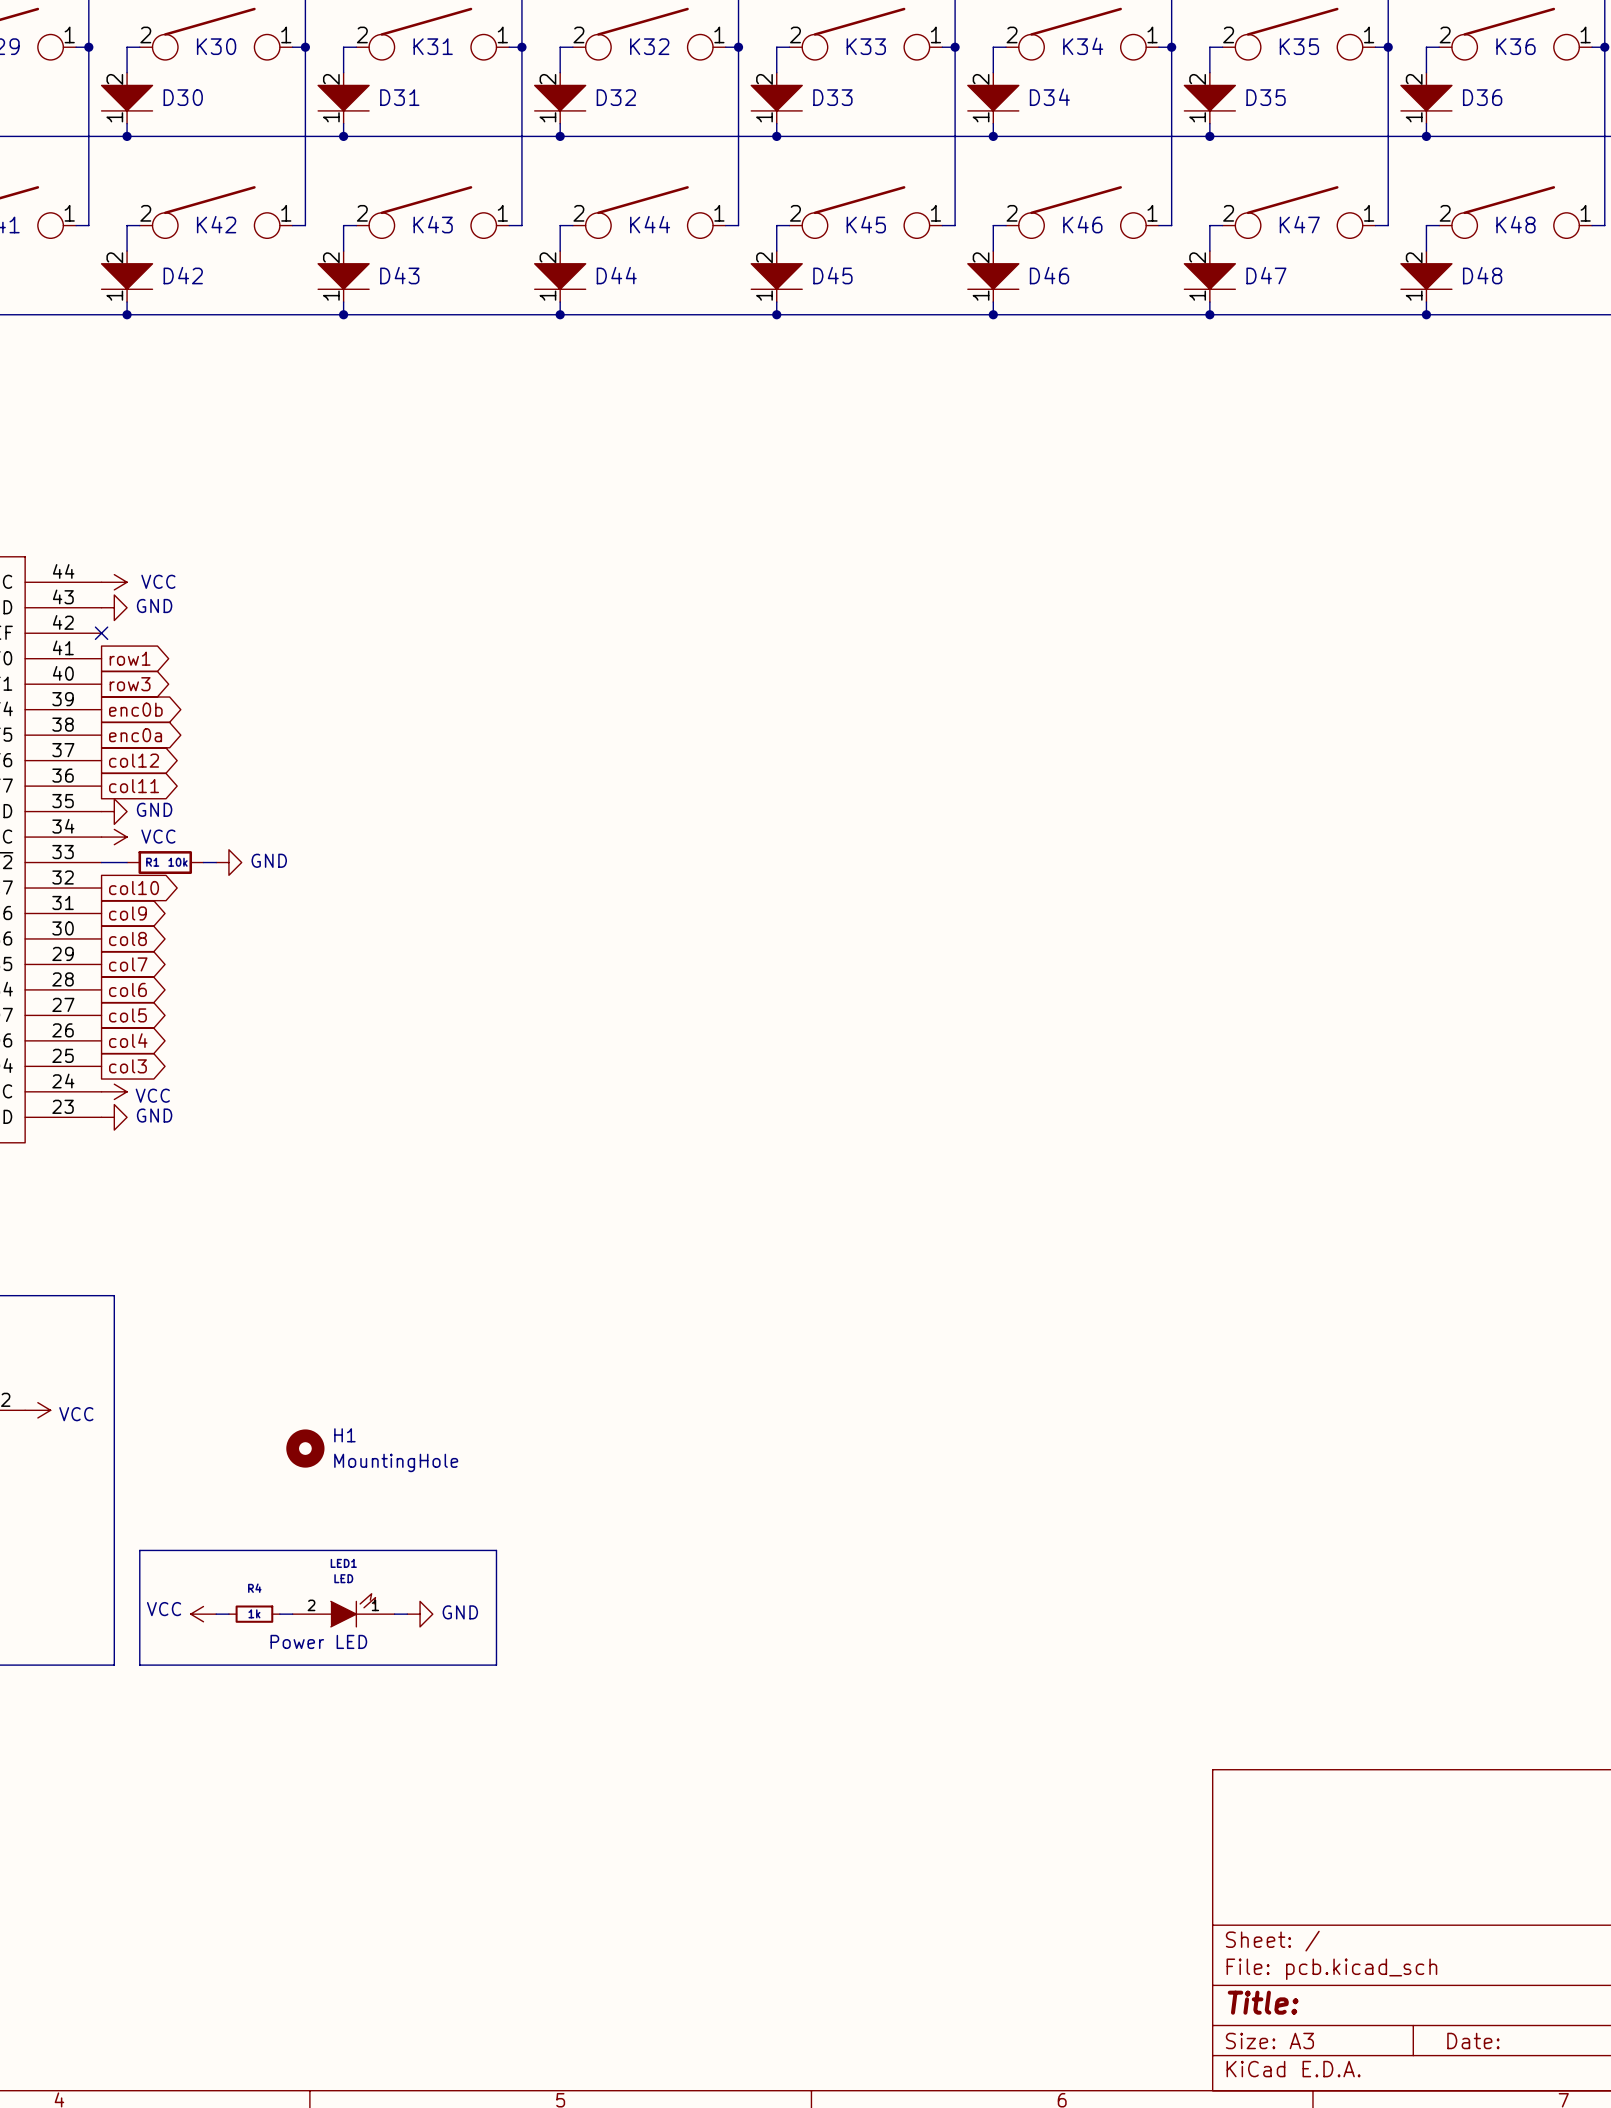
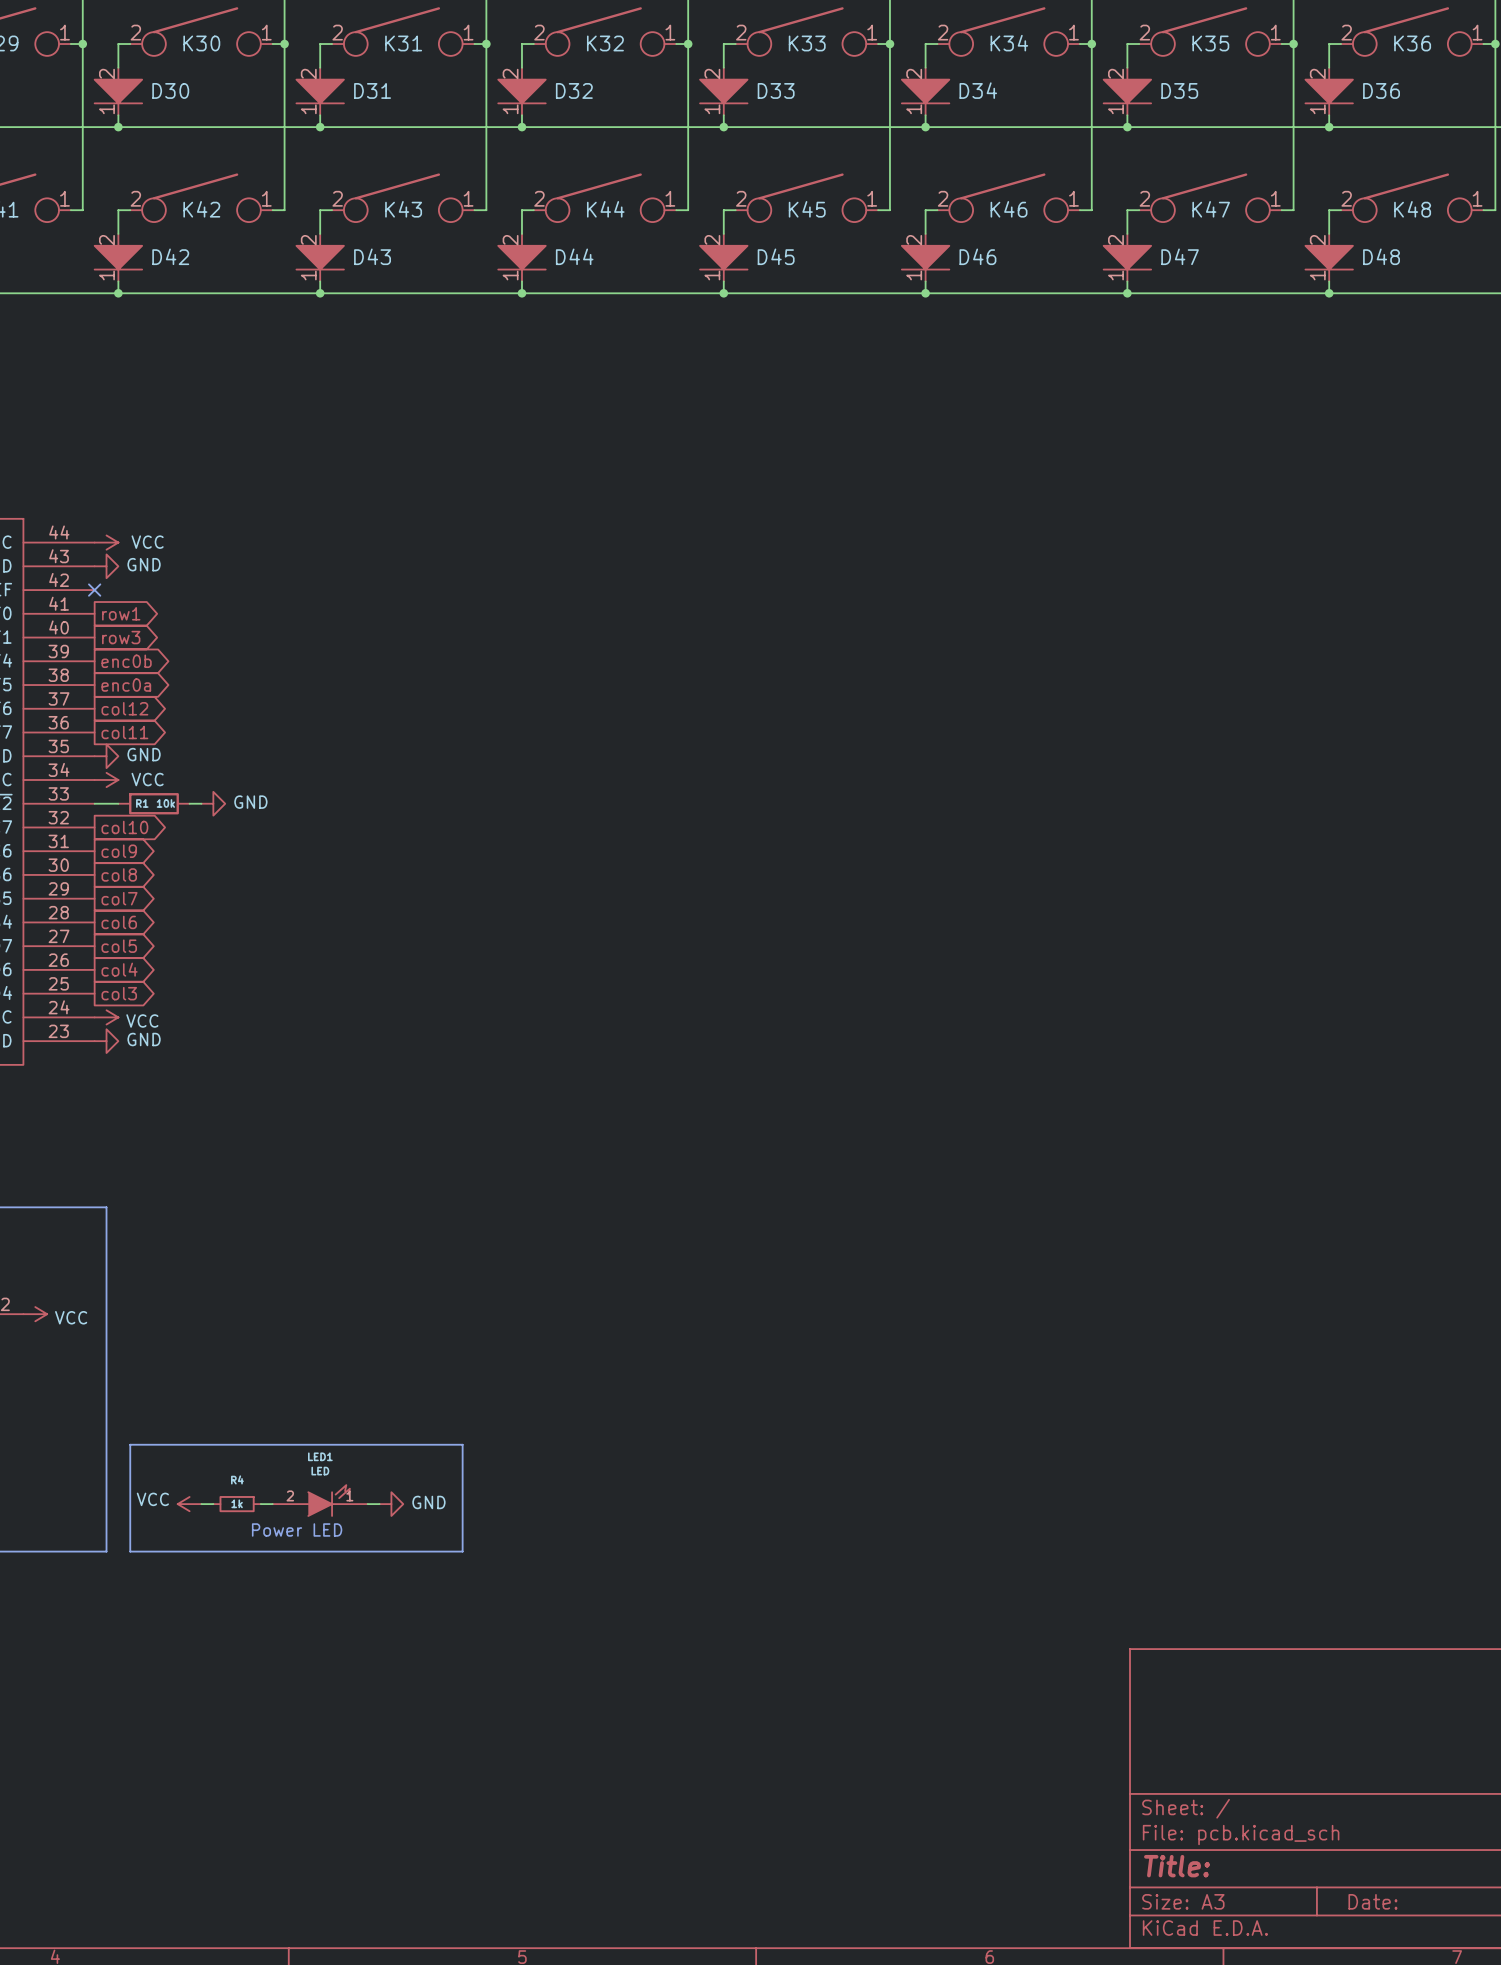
H1: MountingHole (305, 1448) -> none

